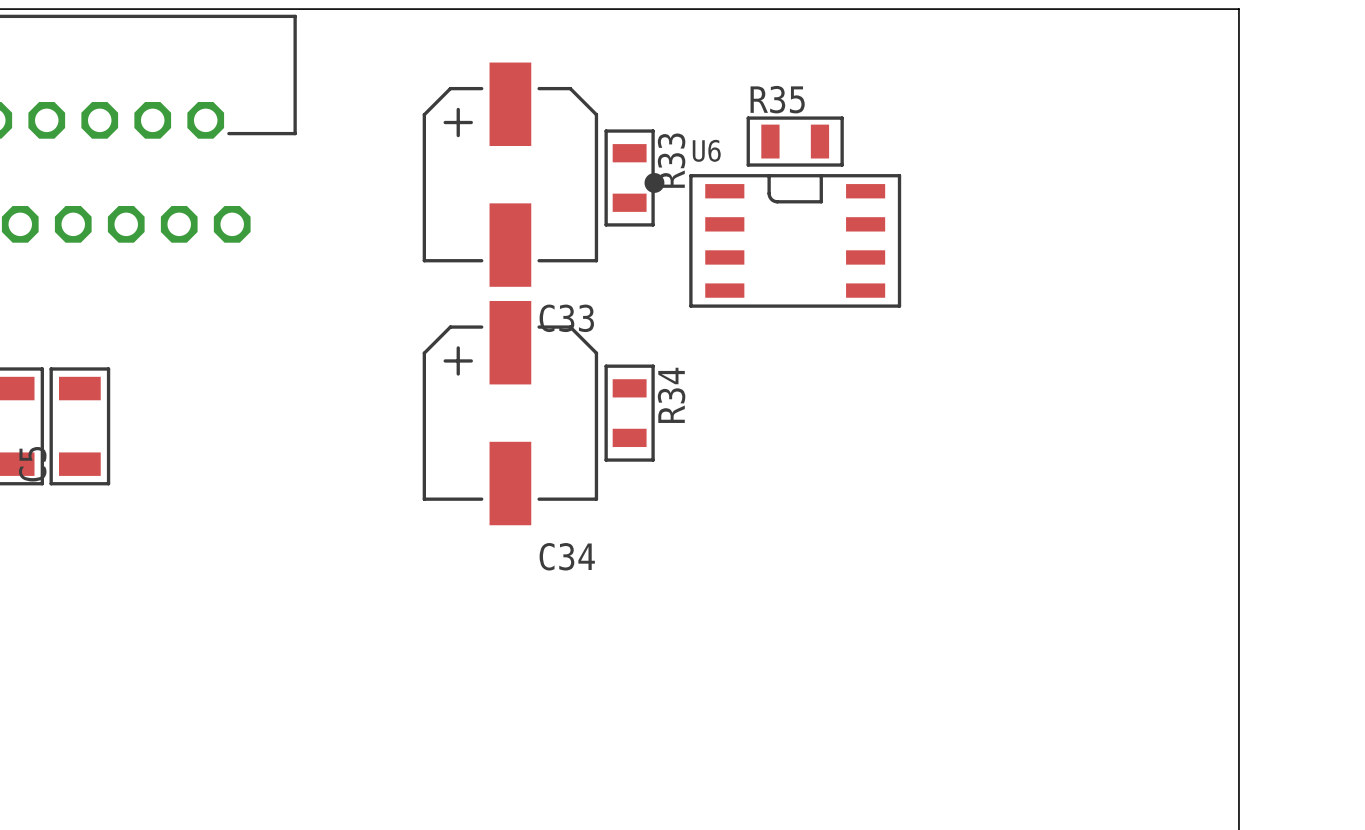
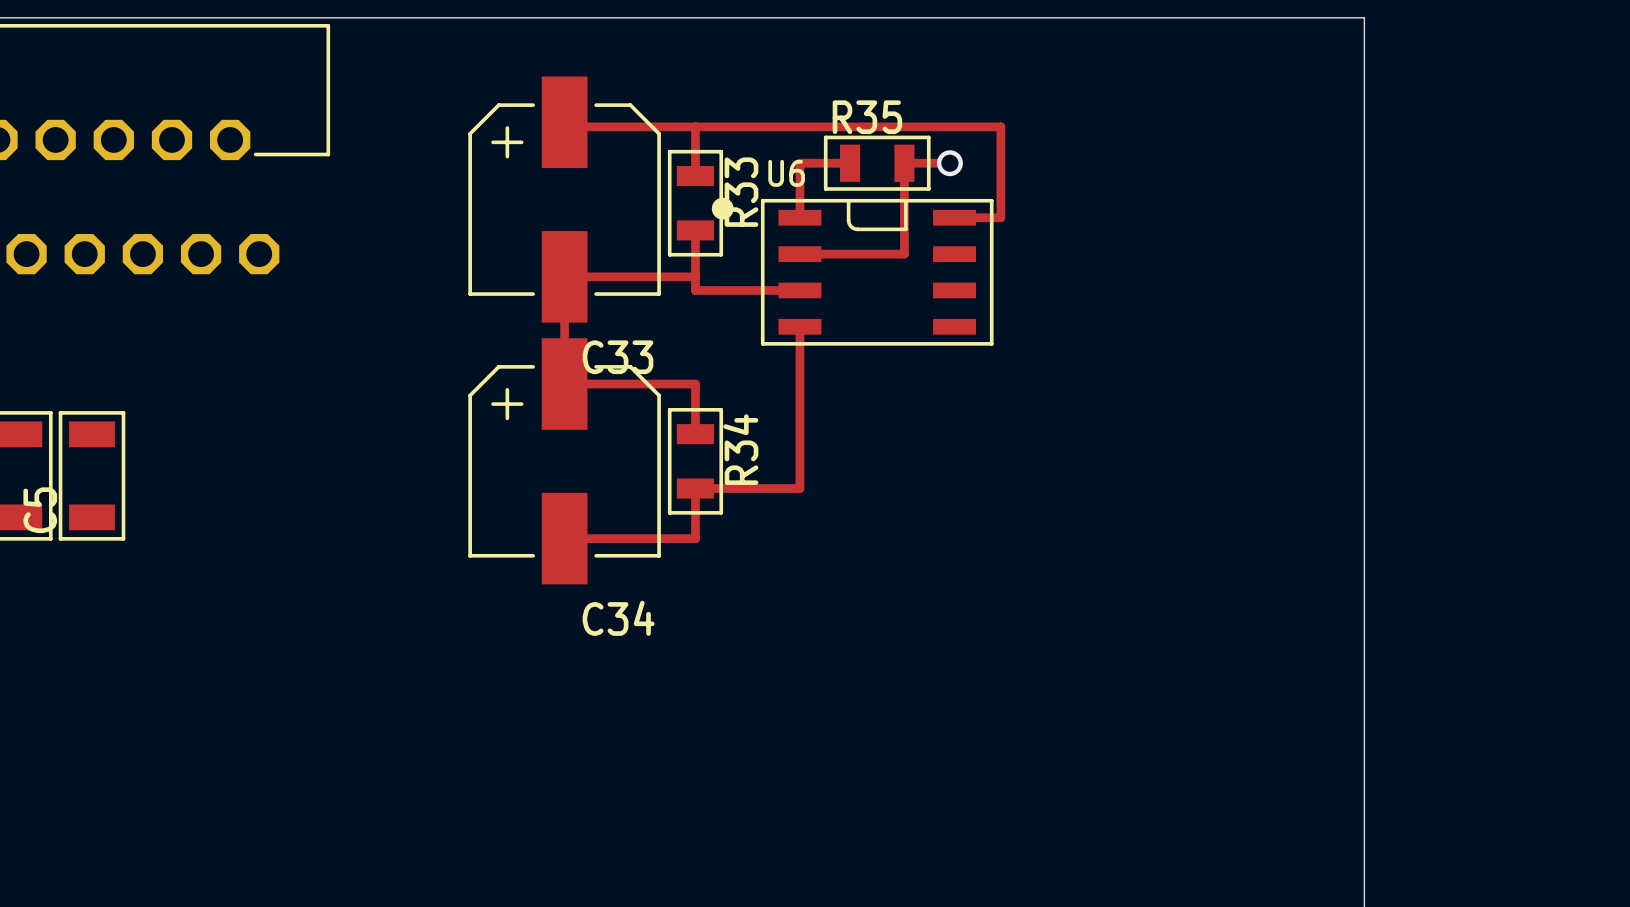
track: none -> (564, 122) (569, 126) (1000, 126) (1000, 217) (954, 217)
track: none -> (695, 126) (695, 176)
track: none -> (850, 163) (799, 163) (799, 217)
track: none -> (949, 163) (904, 163) (904, 254) (799, 254)
via: none -> (949, 163)
track: none -> (695, 230) (695, 290) (799, 290)
track: none -> (695, 276) (564, 276) (564, 384) (695, 384) (695, 434)
track: none -> (799, 326) (799, 488) (695, 488) (695, 538) (564, 538)

